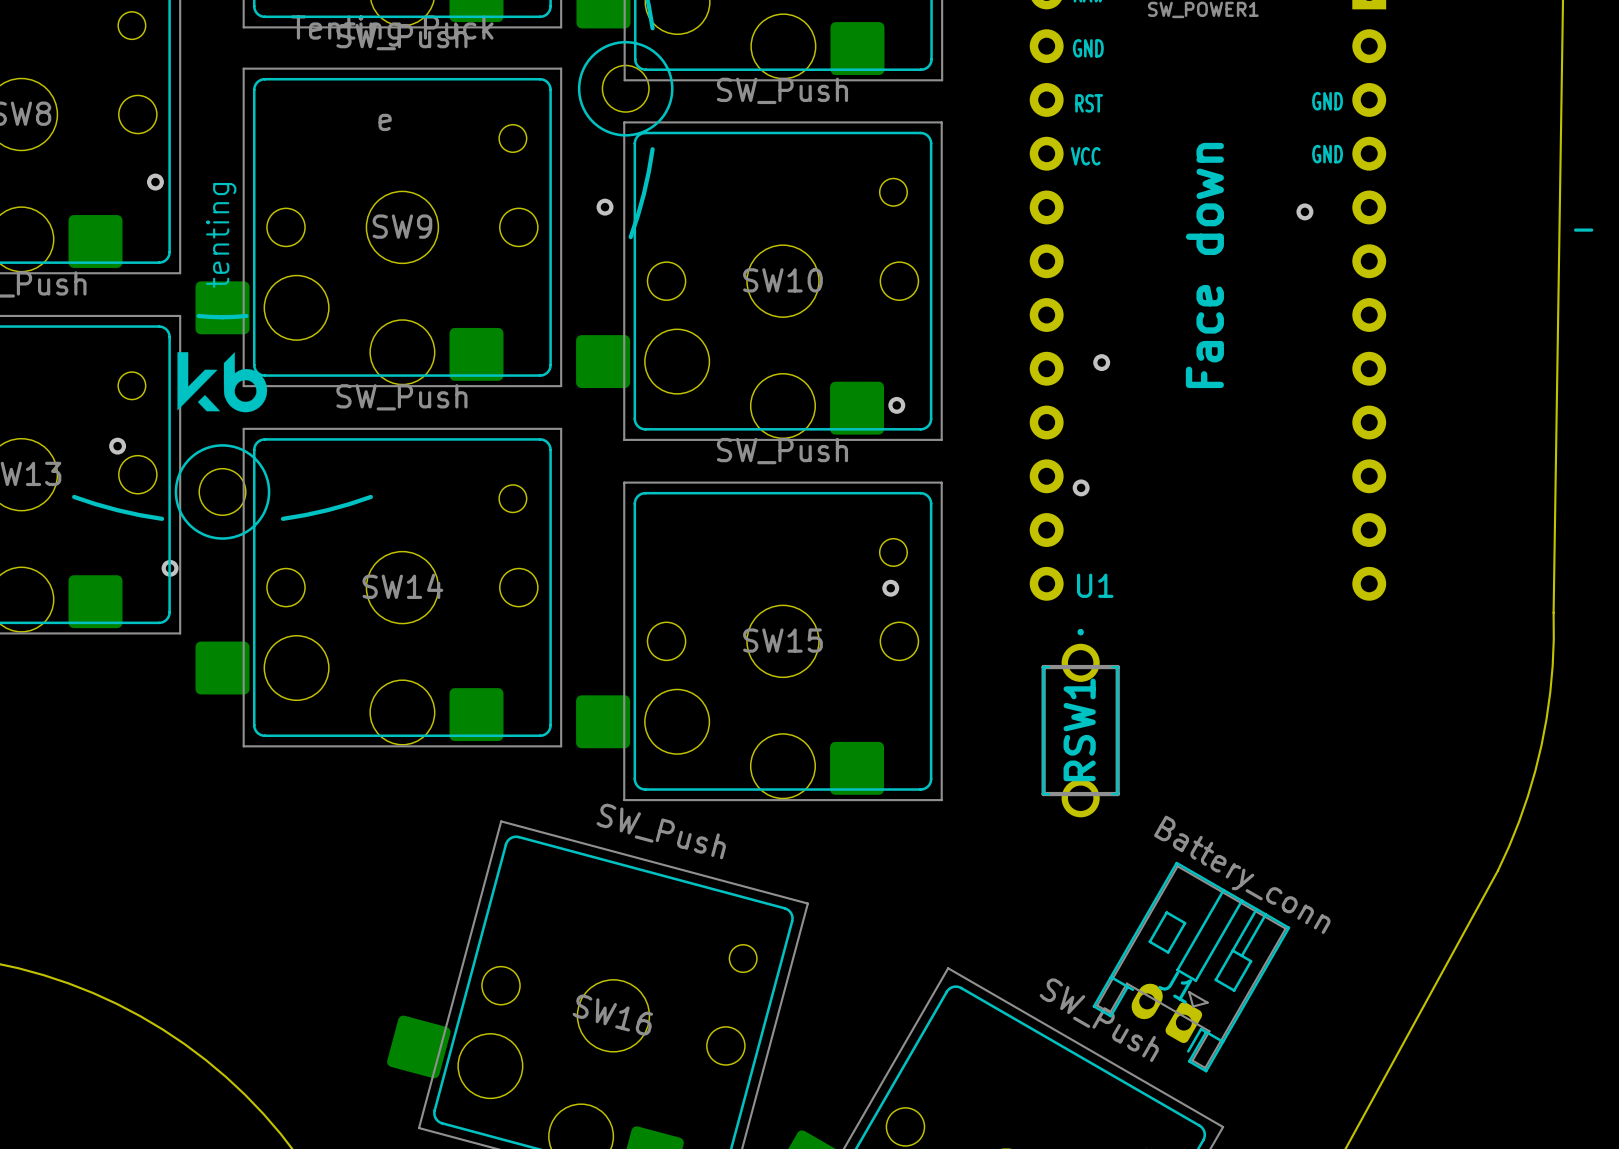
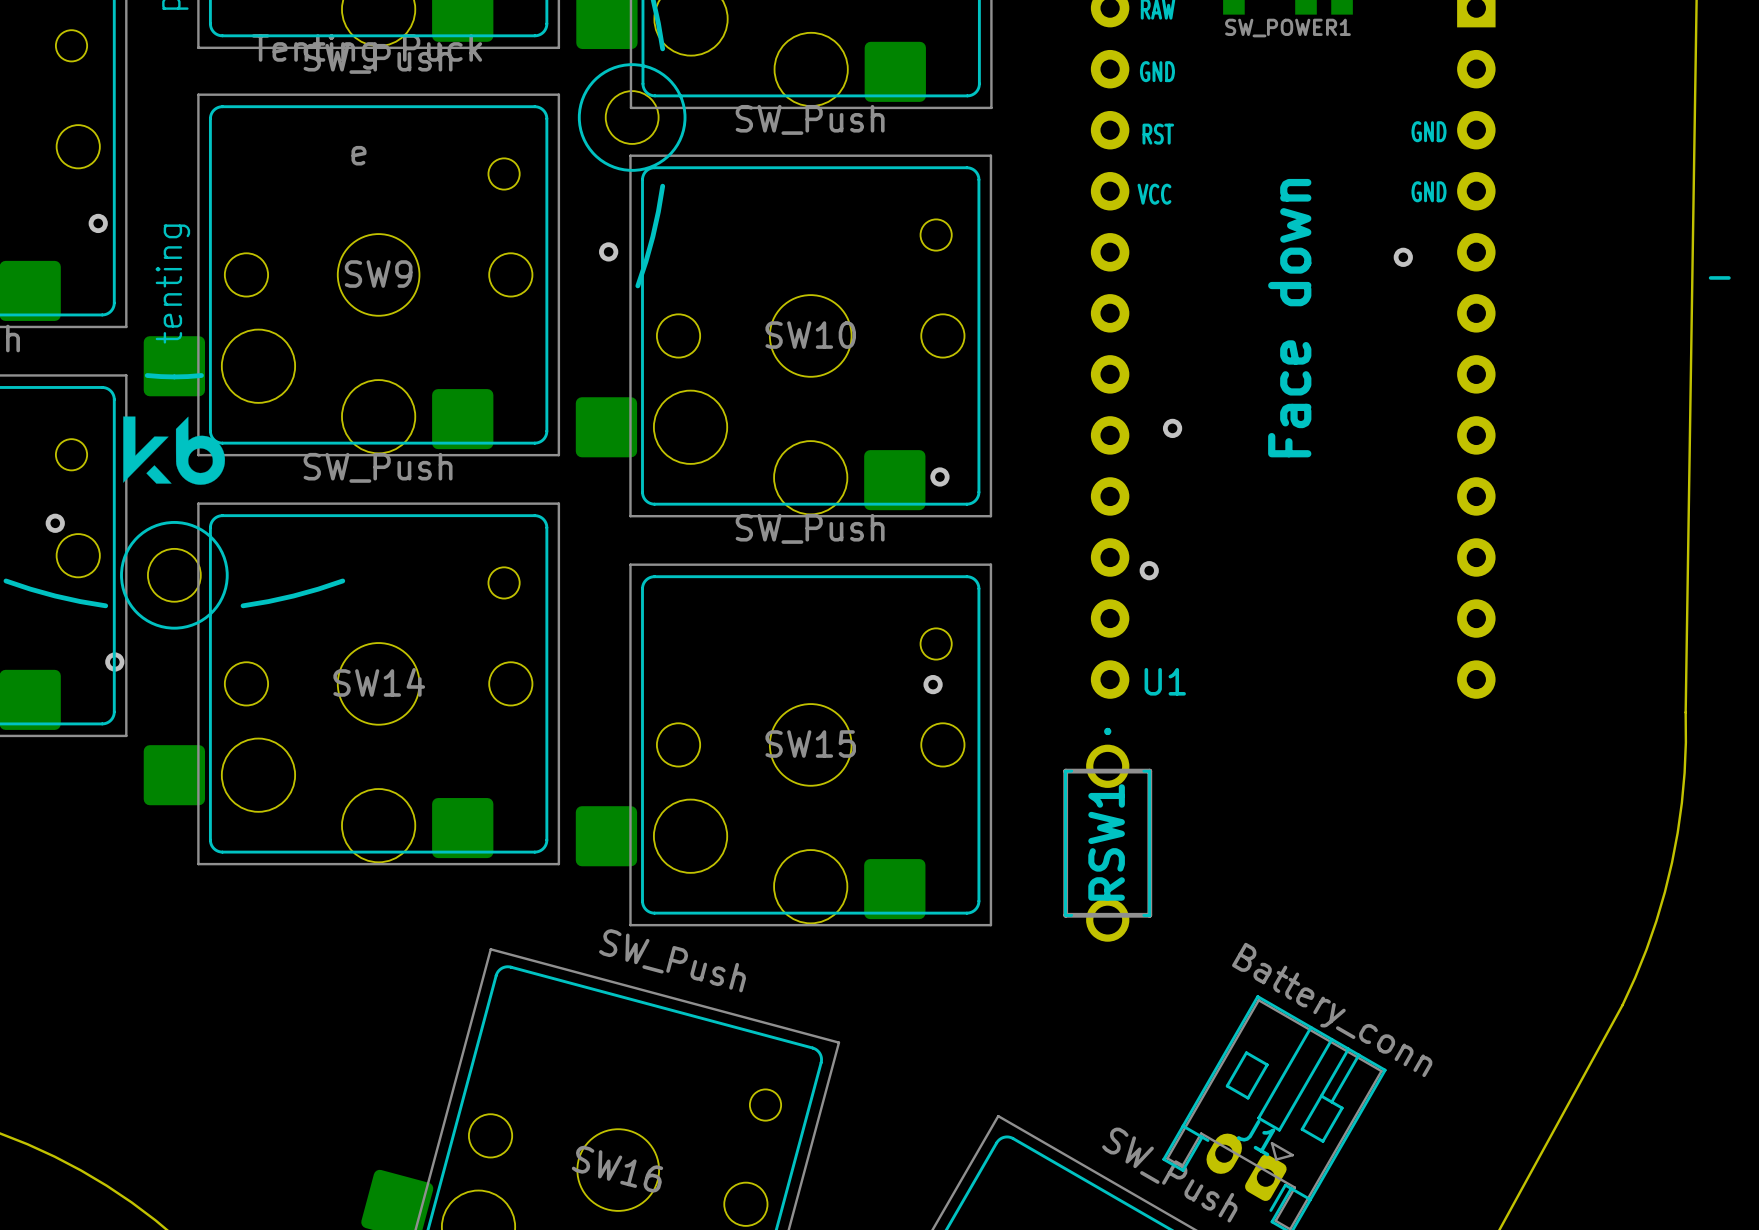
RSW1 position: (1080, 723) -> (1107, 834)

